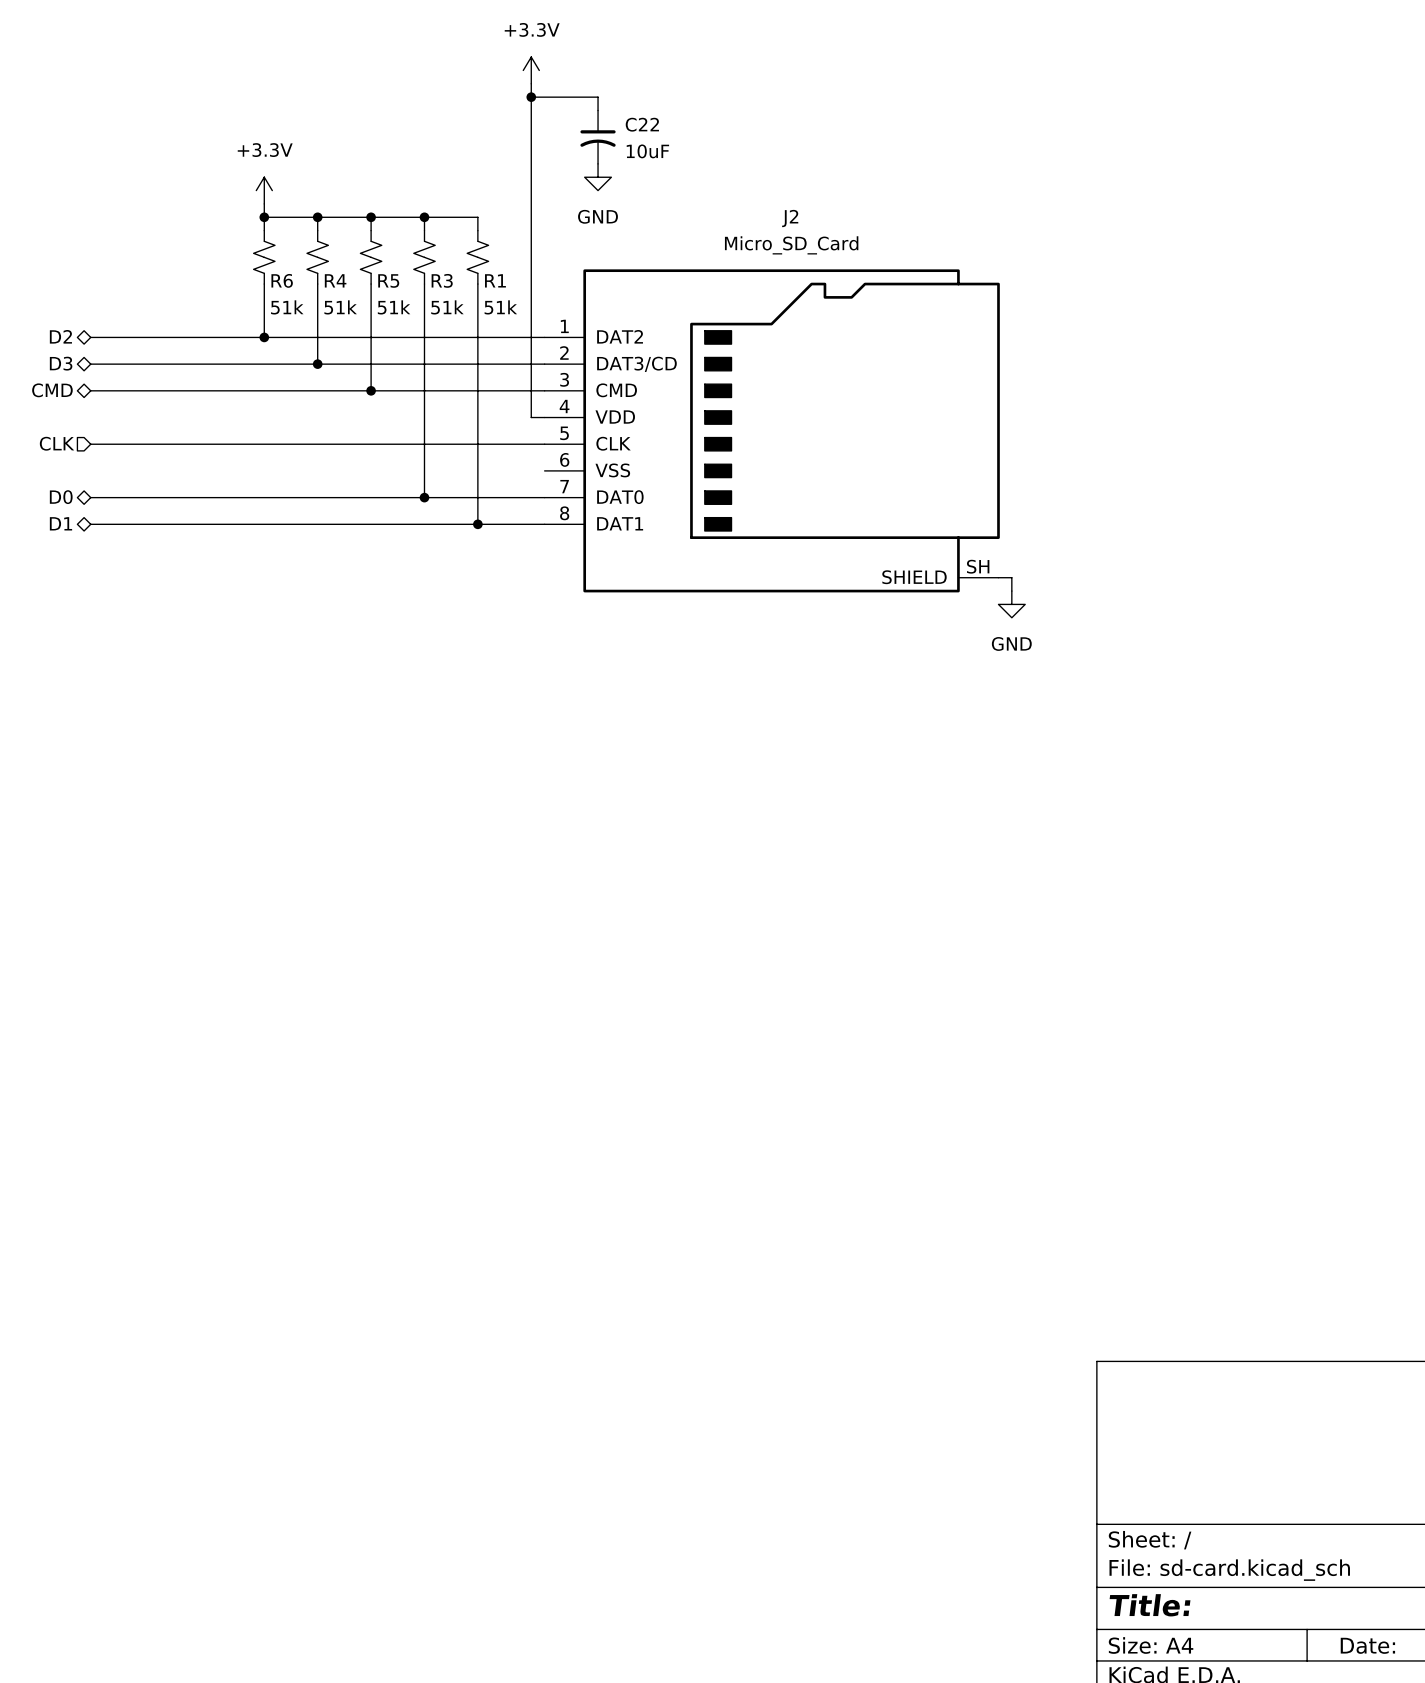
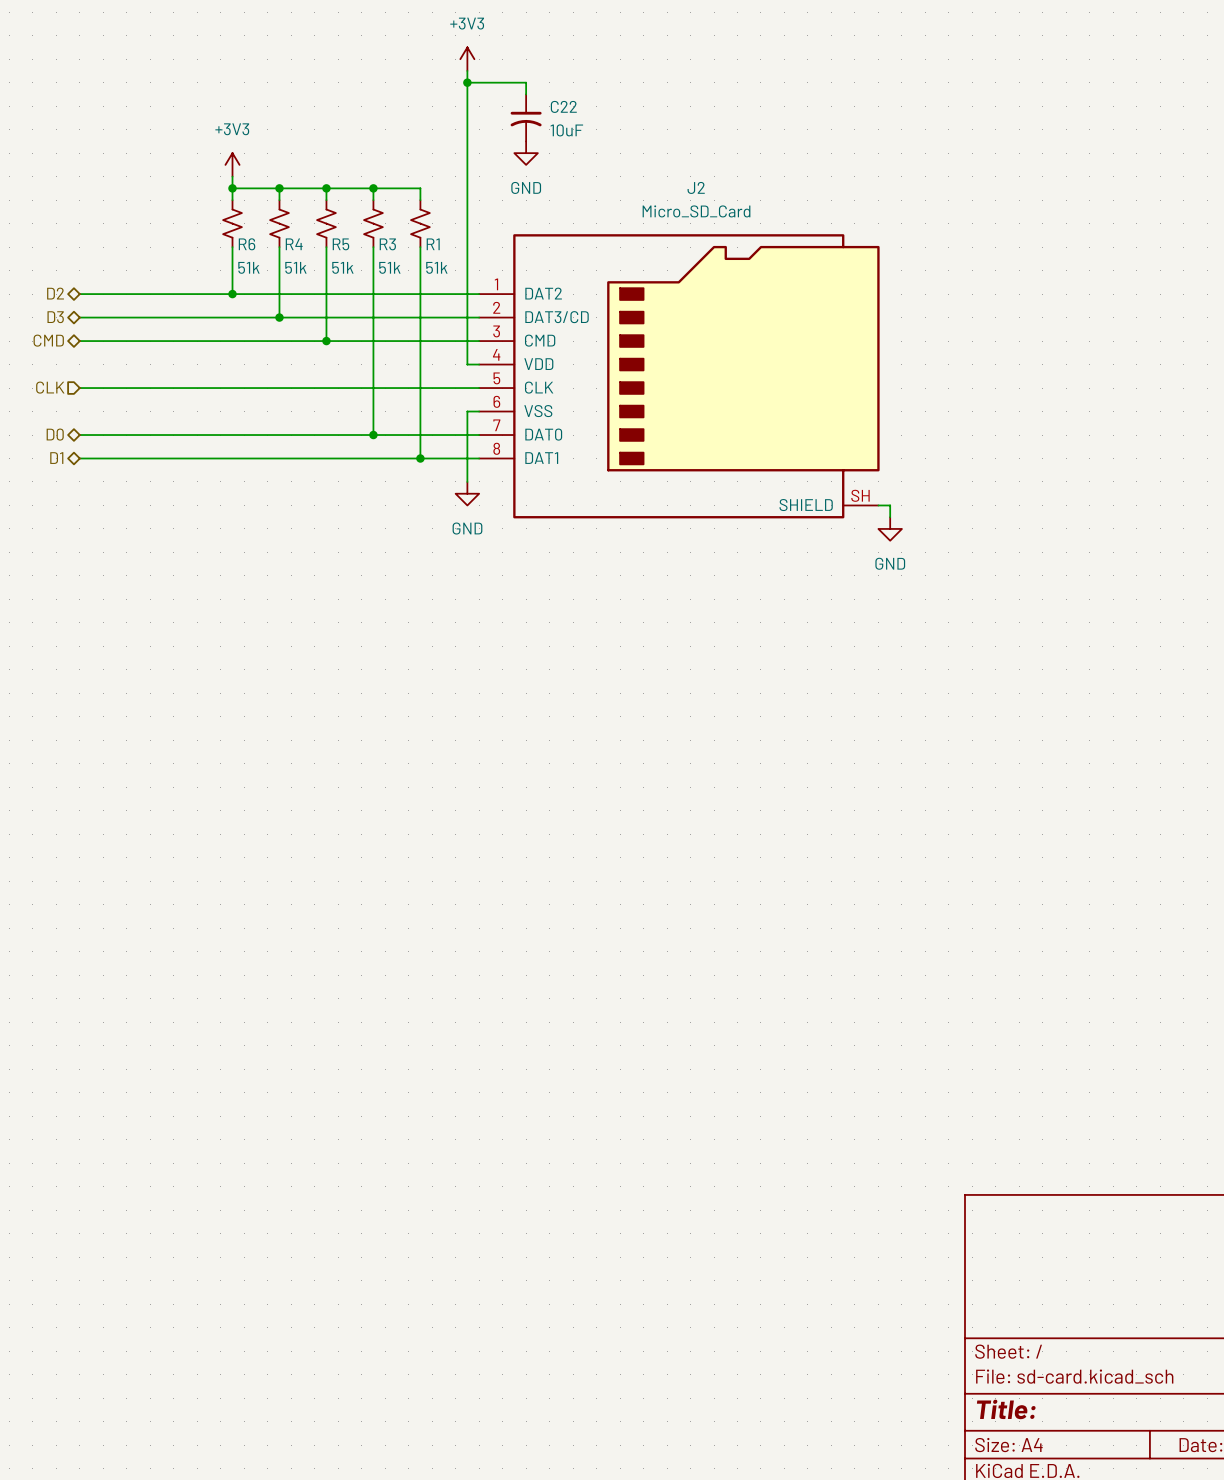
power symbol: +3.3V (531, 70) -> +3V3 (467, 59)
power symbol: +3.3V (264, 190) -> +3V3 (232, 164)
wire: none -> (479, 411) (467, 411) (467, 481)
power symbol: none -> GND (467, 493)

